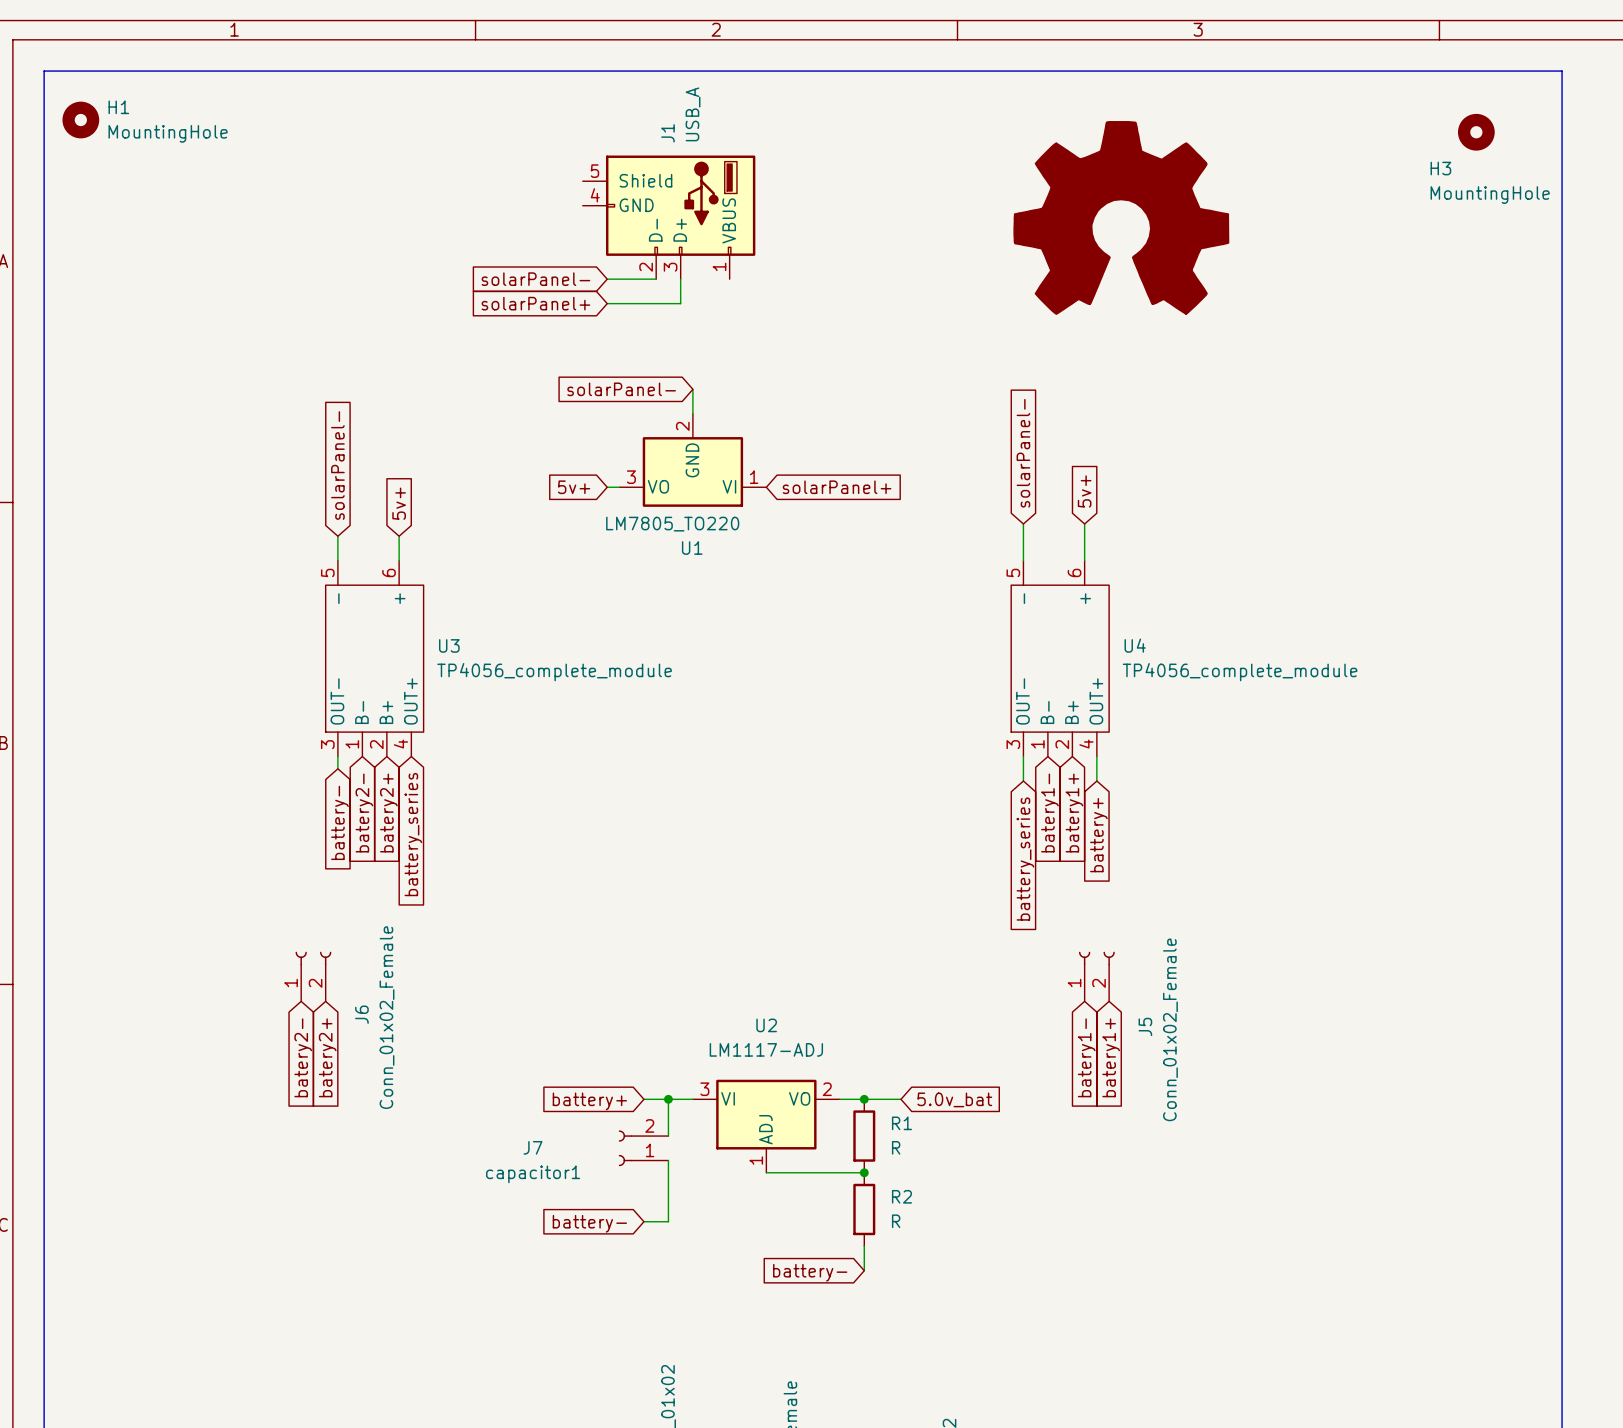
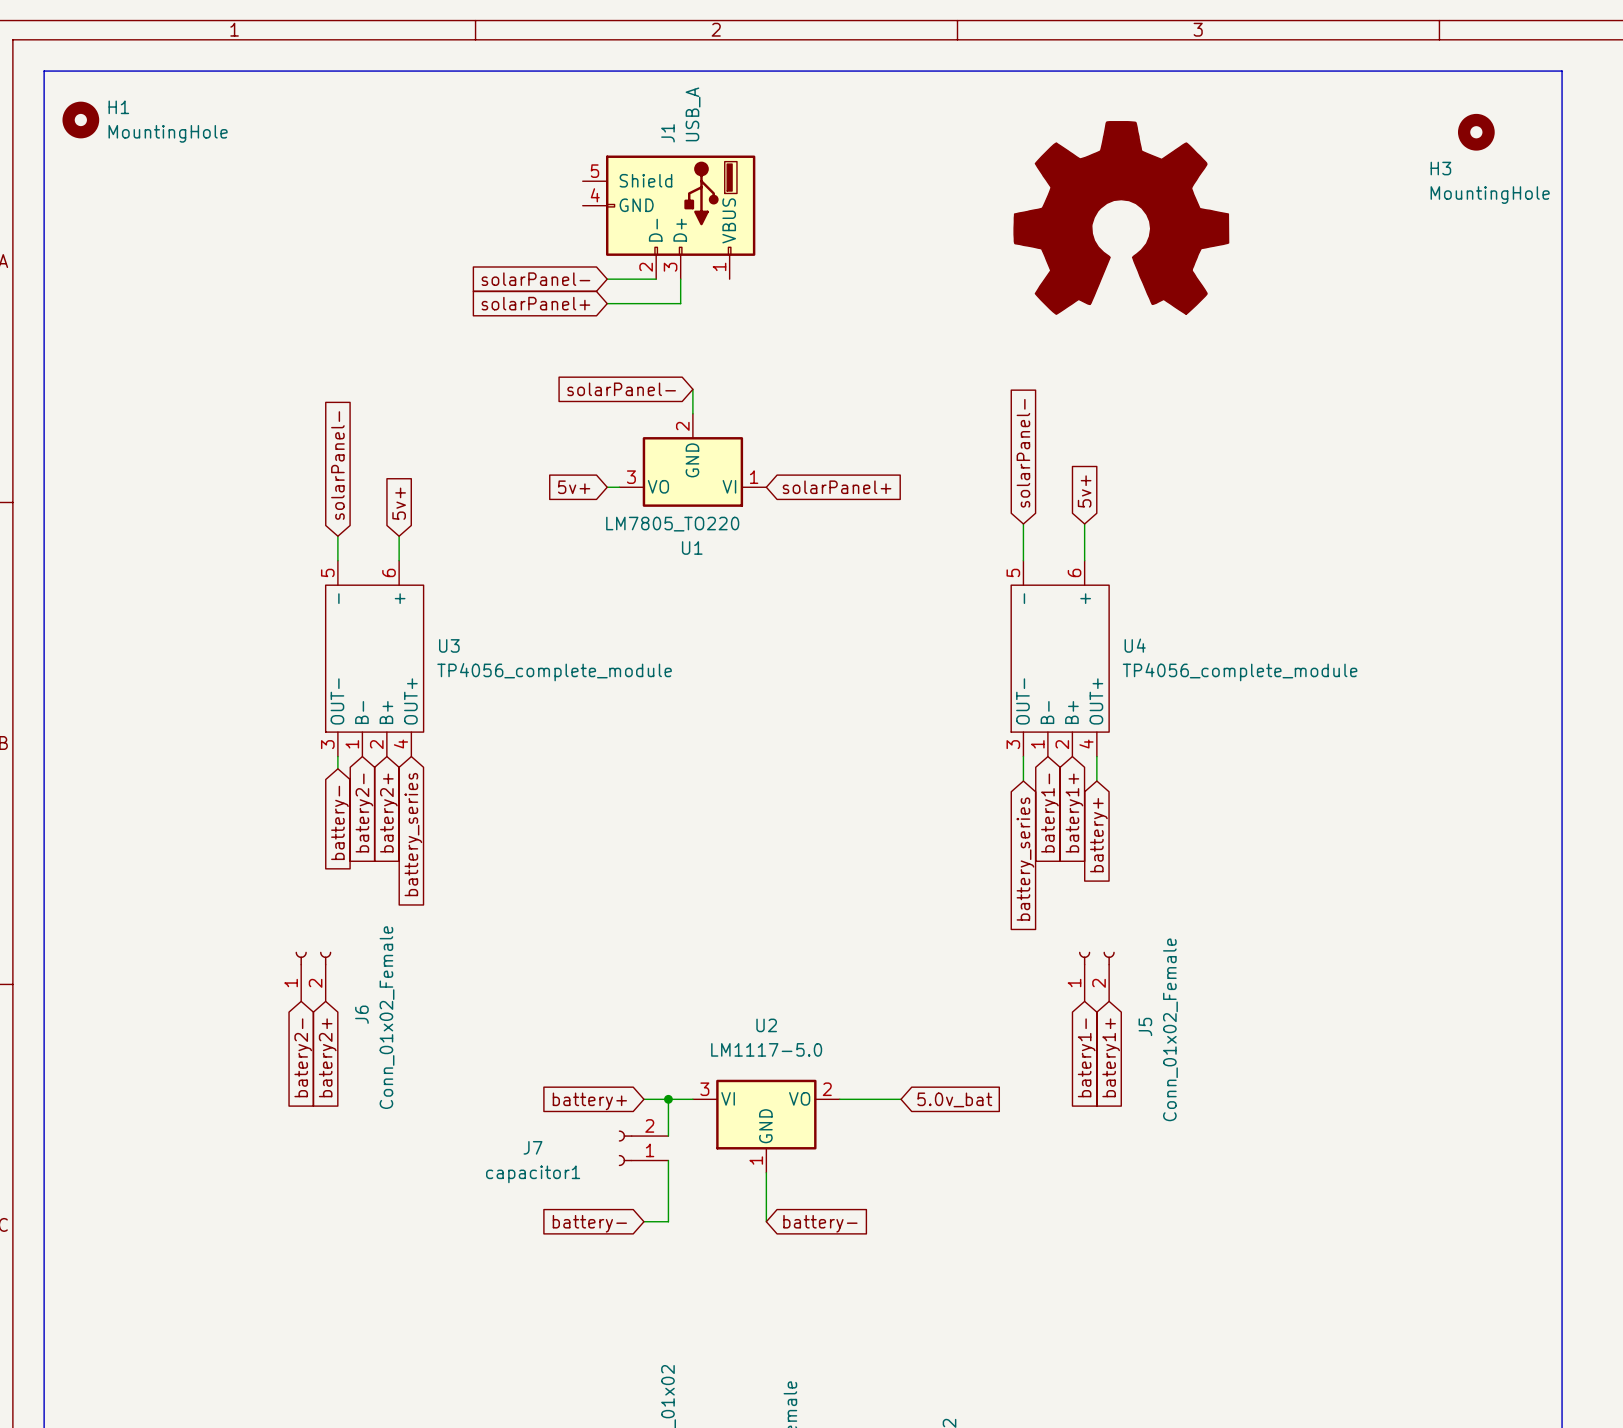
U2 value: LM1117-ADJ (766, 1049) -> LM1117-5.0 (766, 1049)
junction: (864, 1099) -> none
U2 pin name: ADJ (765, 1129) -> GND (765, 1126)
R1: R (864, 1136) -> none
wire: (766, 1172) (864, 1172) -> (766, 1172) (766, 1221)
junction: (864, 1172) -> none
R2: R (864, 1209) -> none
wire: (864, 1246) (864, 1270) -> none
global label rotation: 0° (810, 1272) -> 180° (820, 1223)

